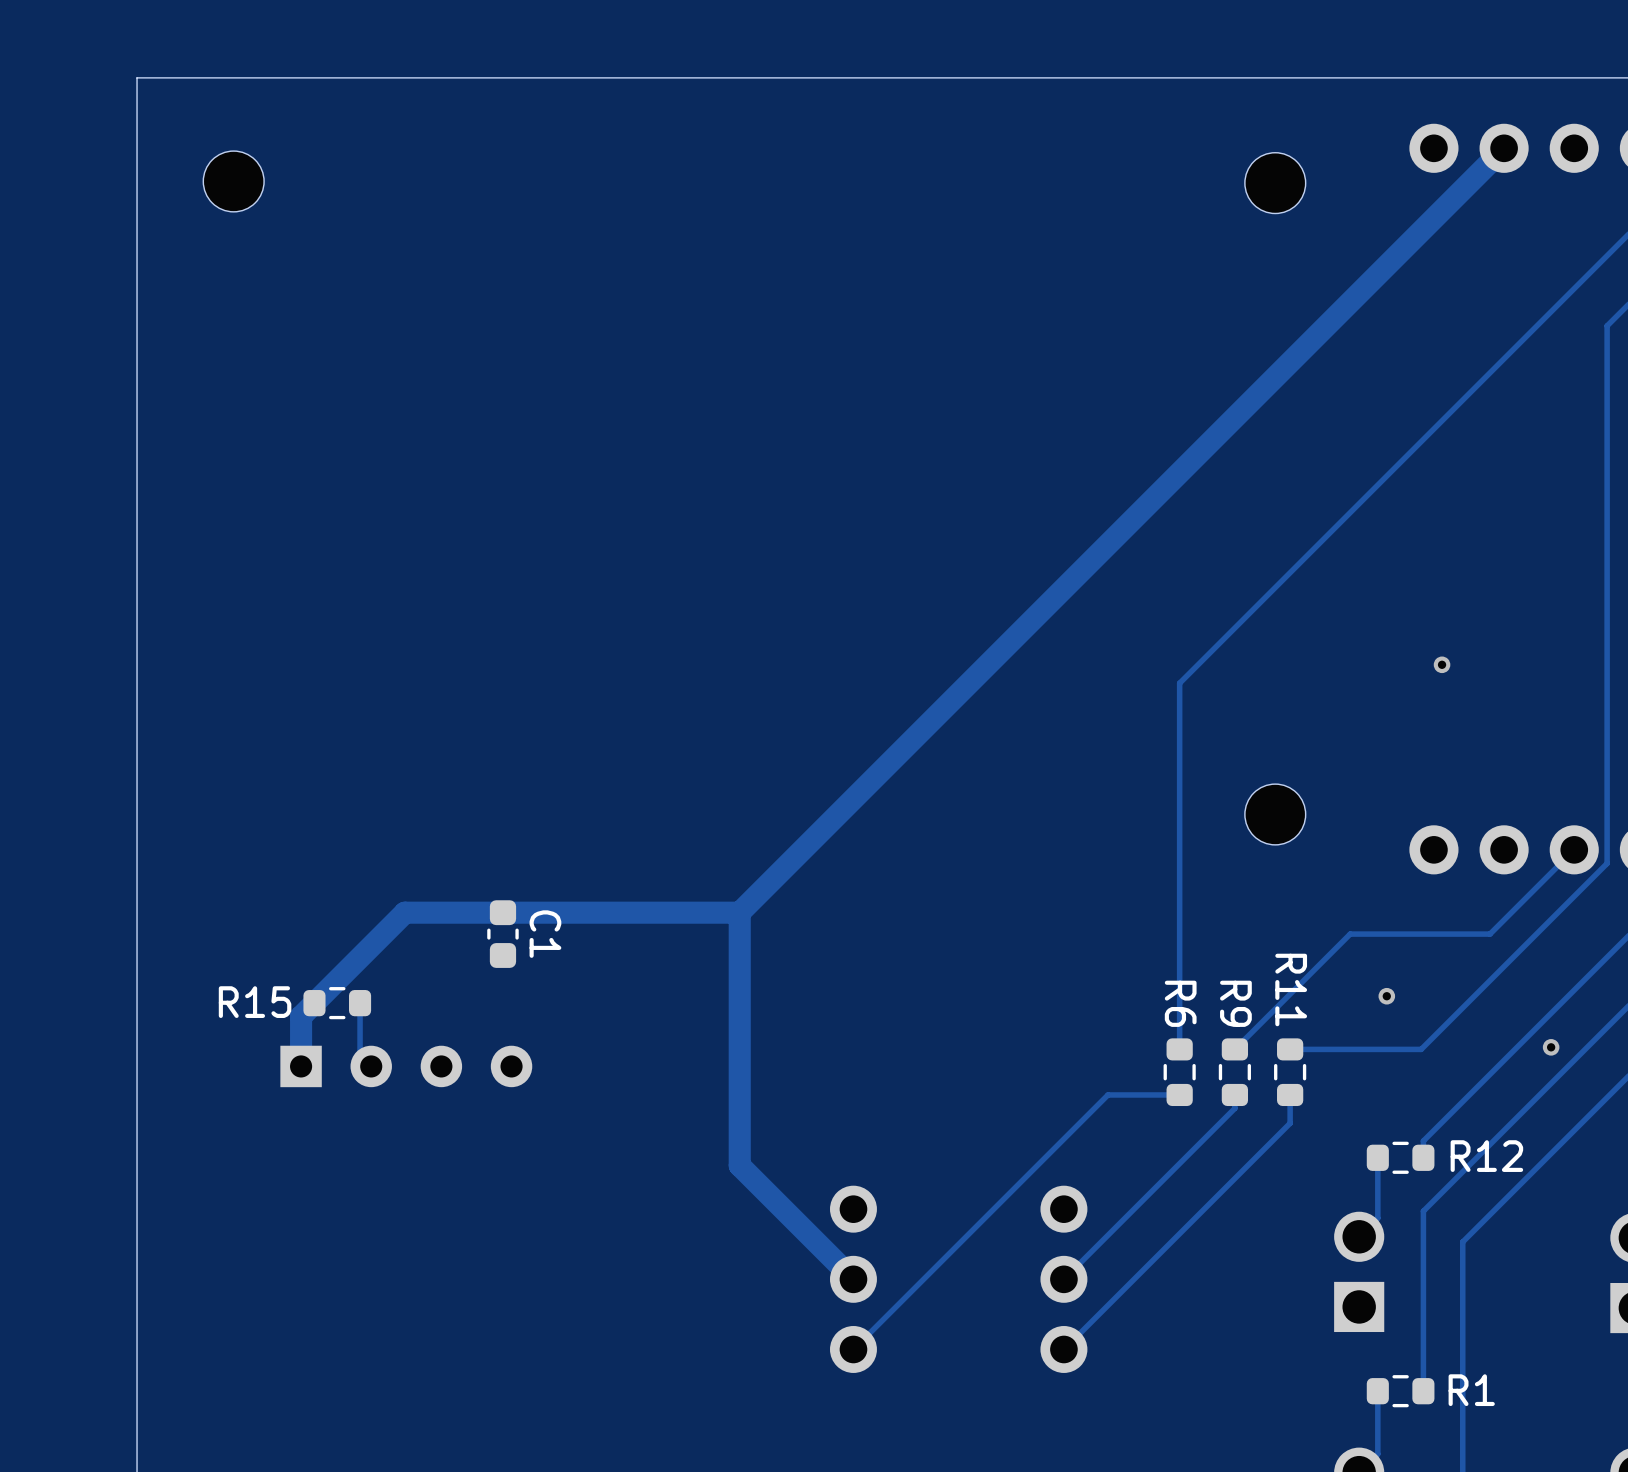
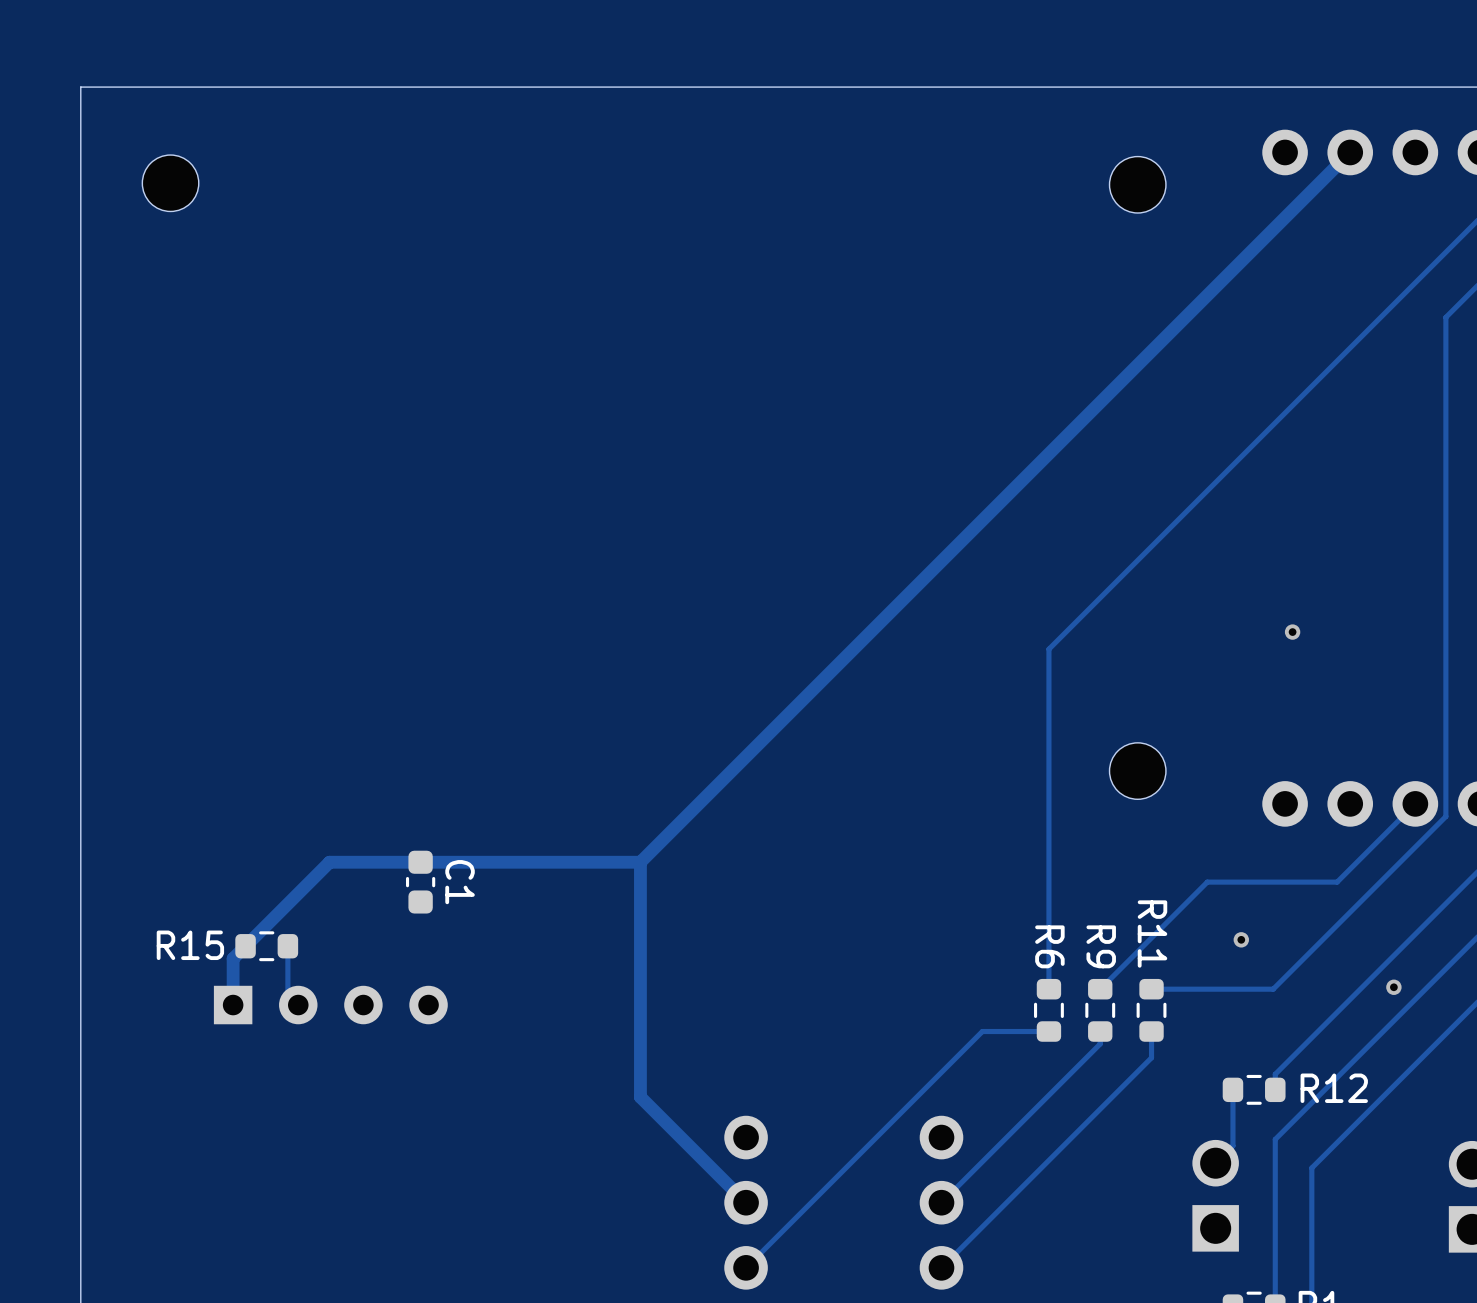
track width: thick (1504, 148) (739, 912) -> thin (1350, 152) (640, 862)
track width: thick (739, 912) (404, 912) (301, 1016) (301, 1066) -> thin (640, 862) (329, 862) (233, 958) (233, 1005)
track width: thick (739, 912) (739, 1165) (853, 1279) -> thin (640, 862) (640, 1097) (746, 1202)

